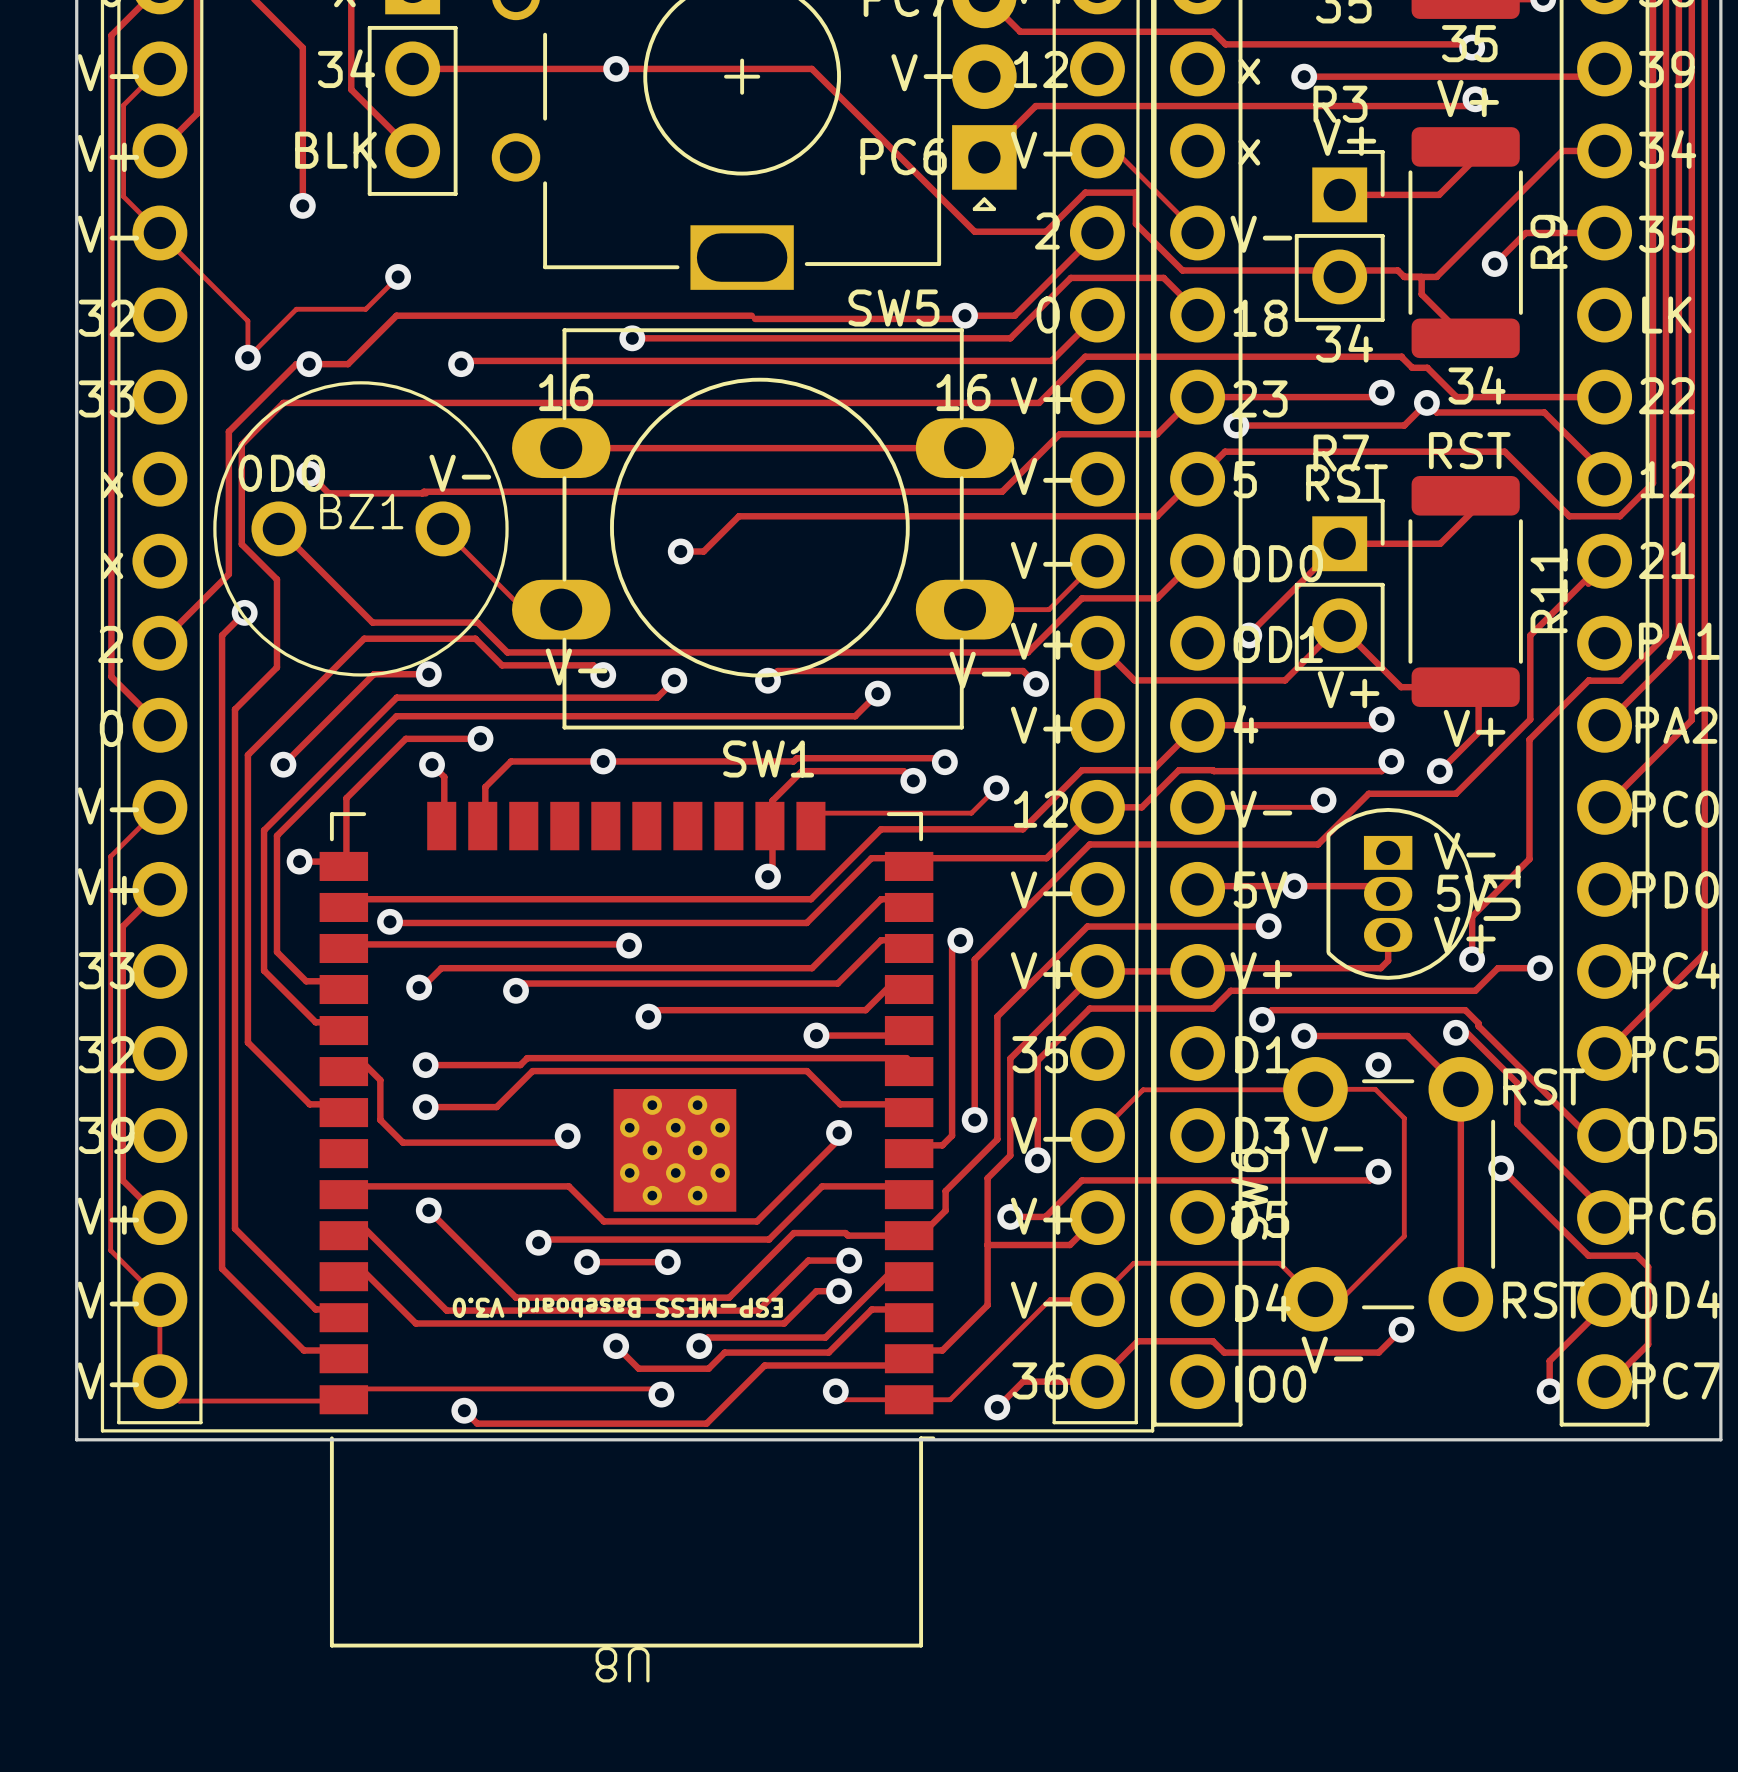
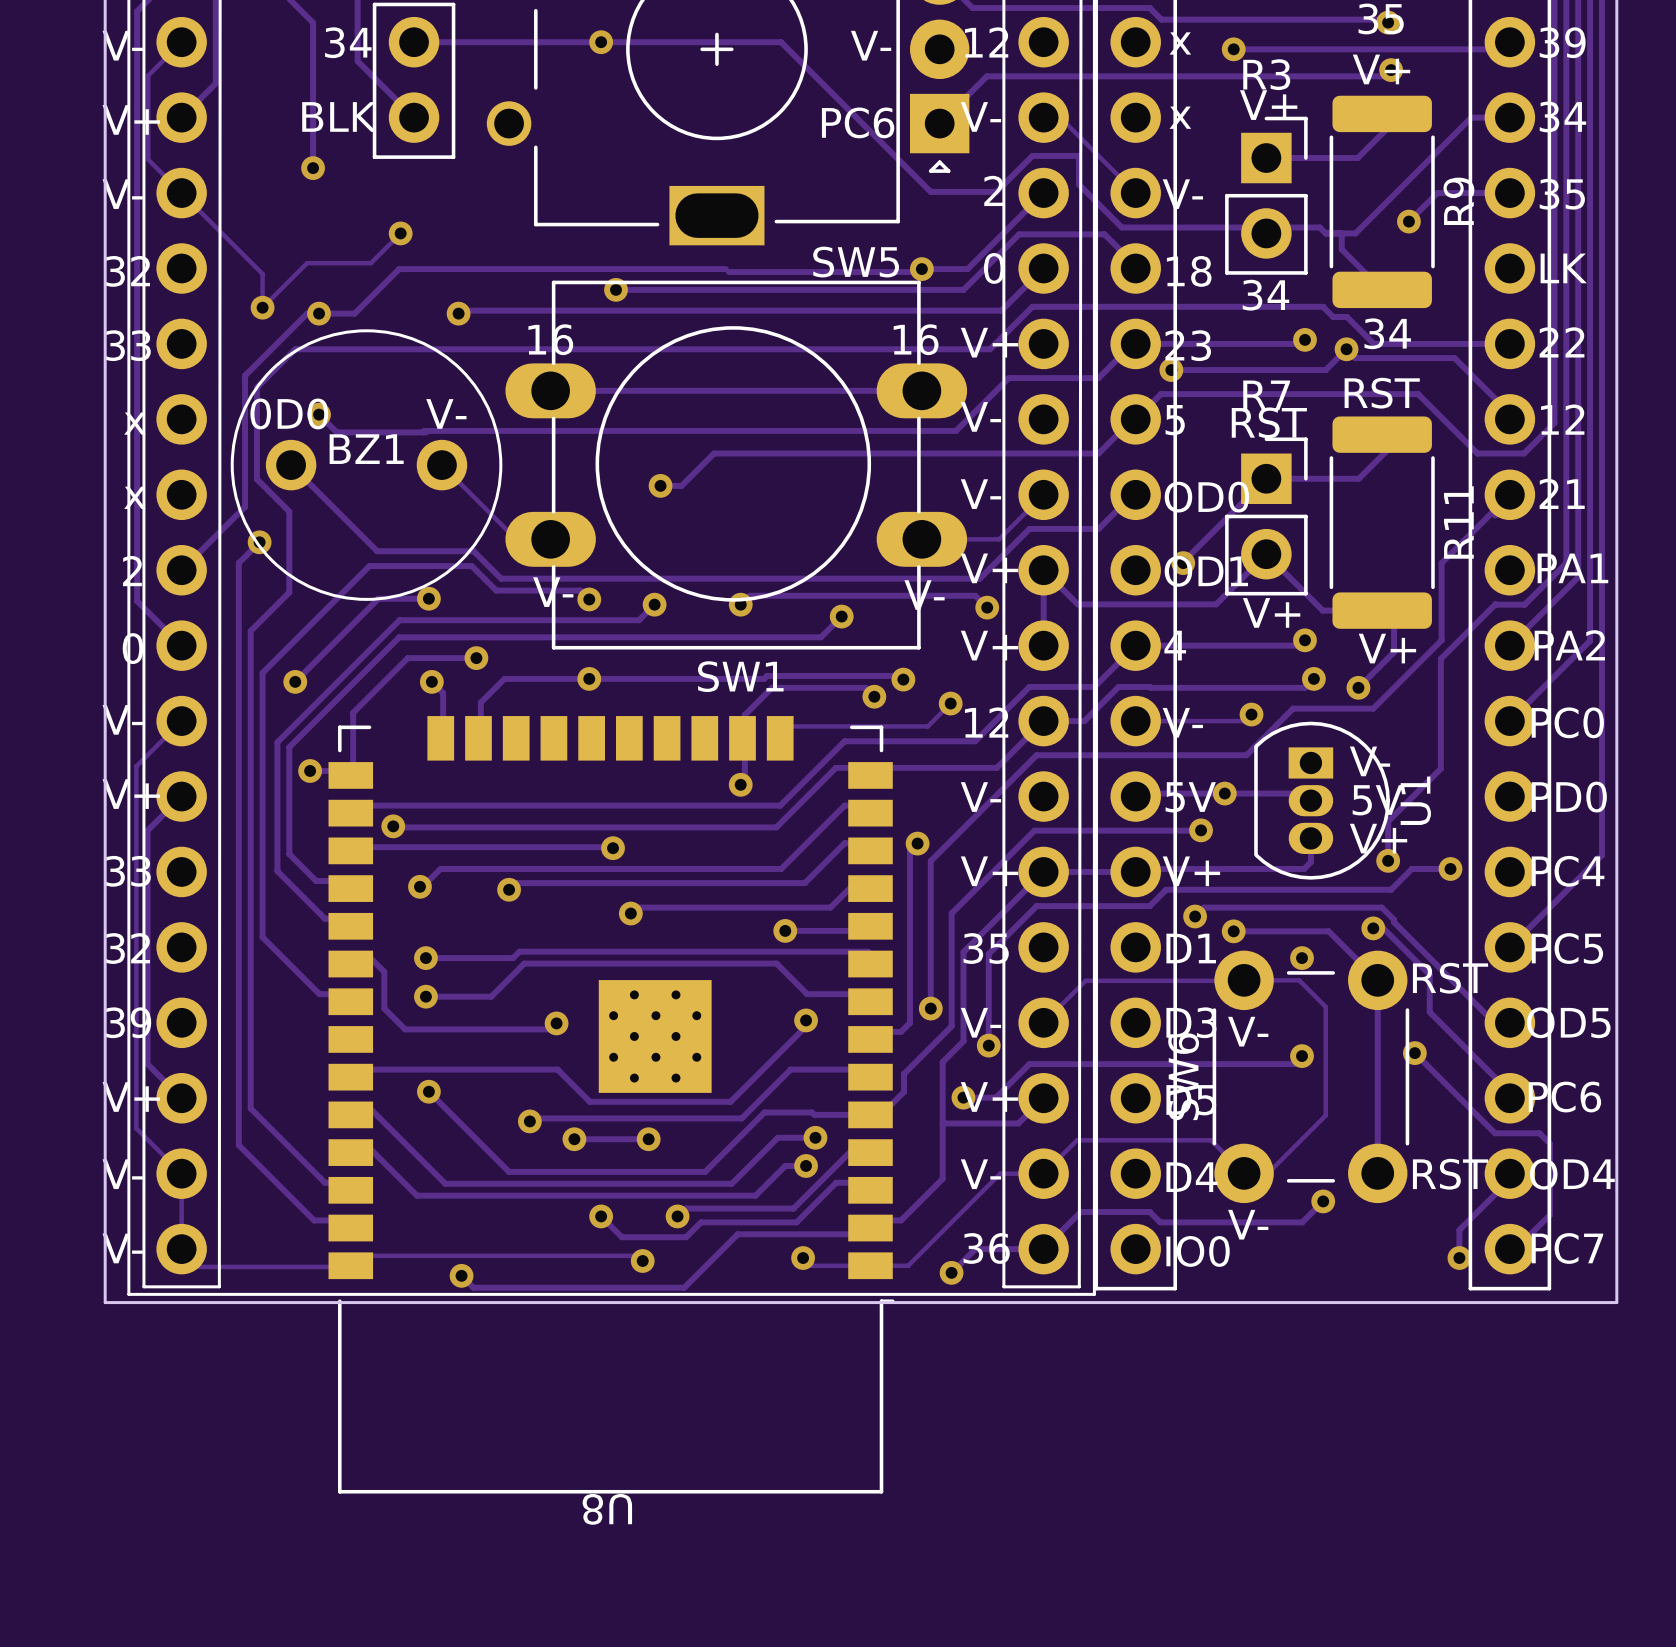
text: ESP-MESS Baseboard V3.0 (617, 1307) -> none

